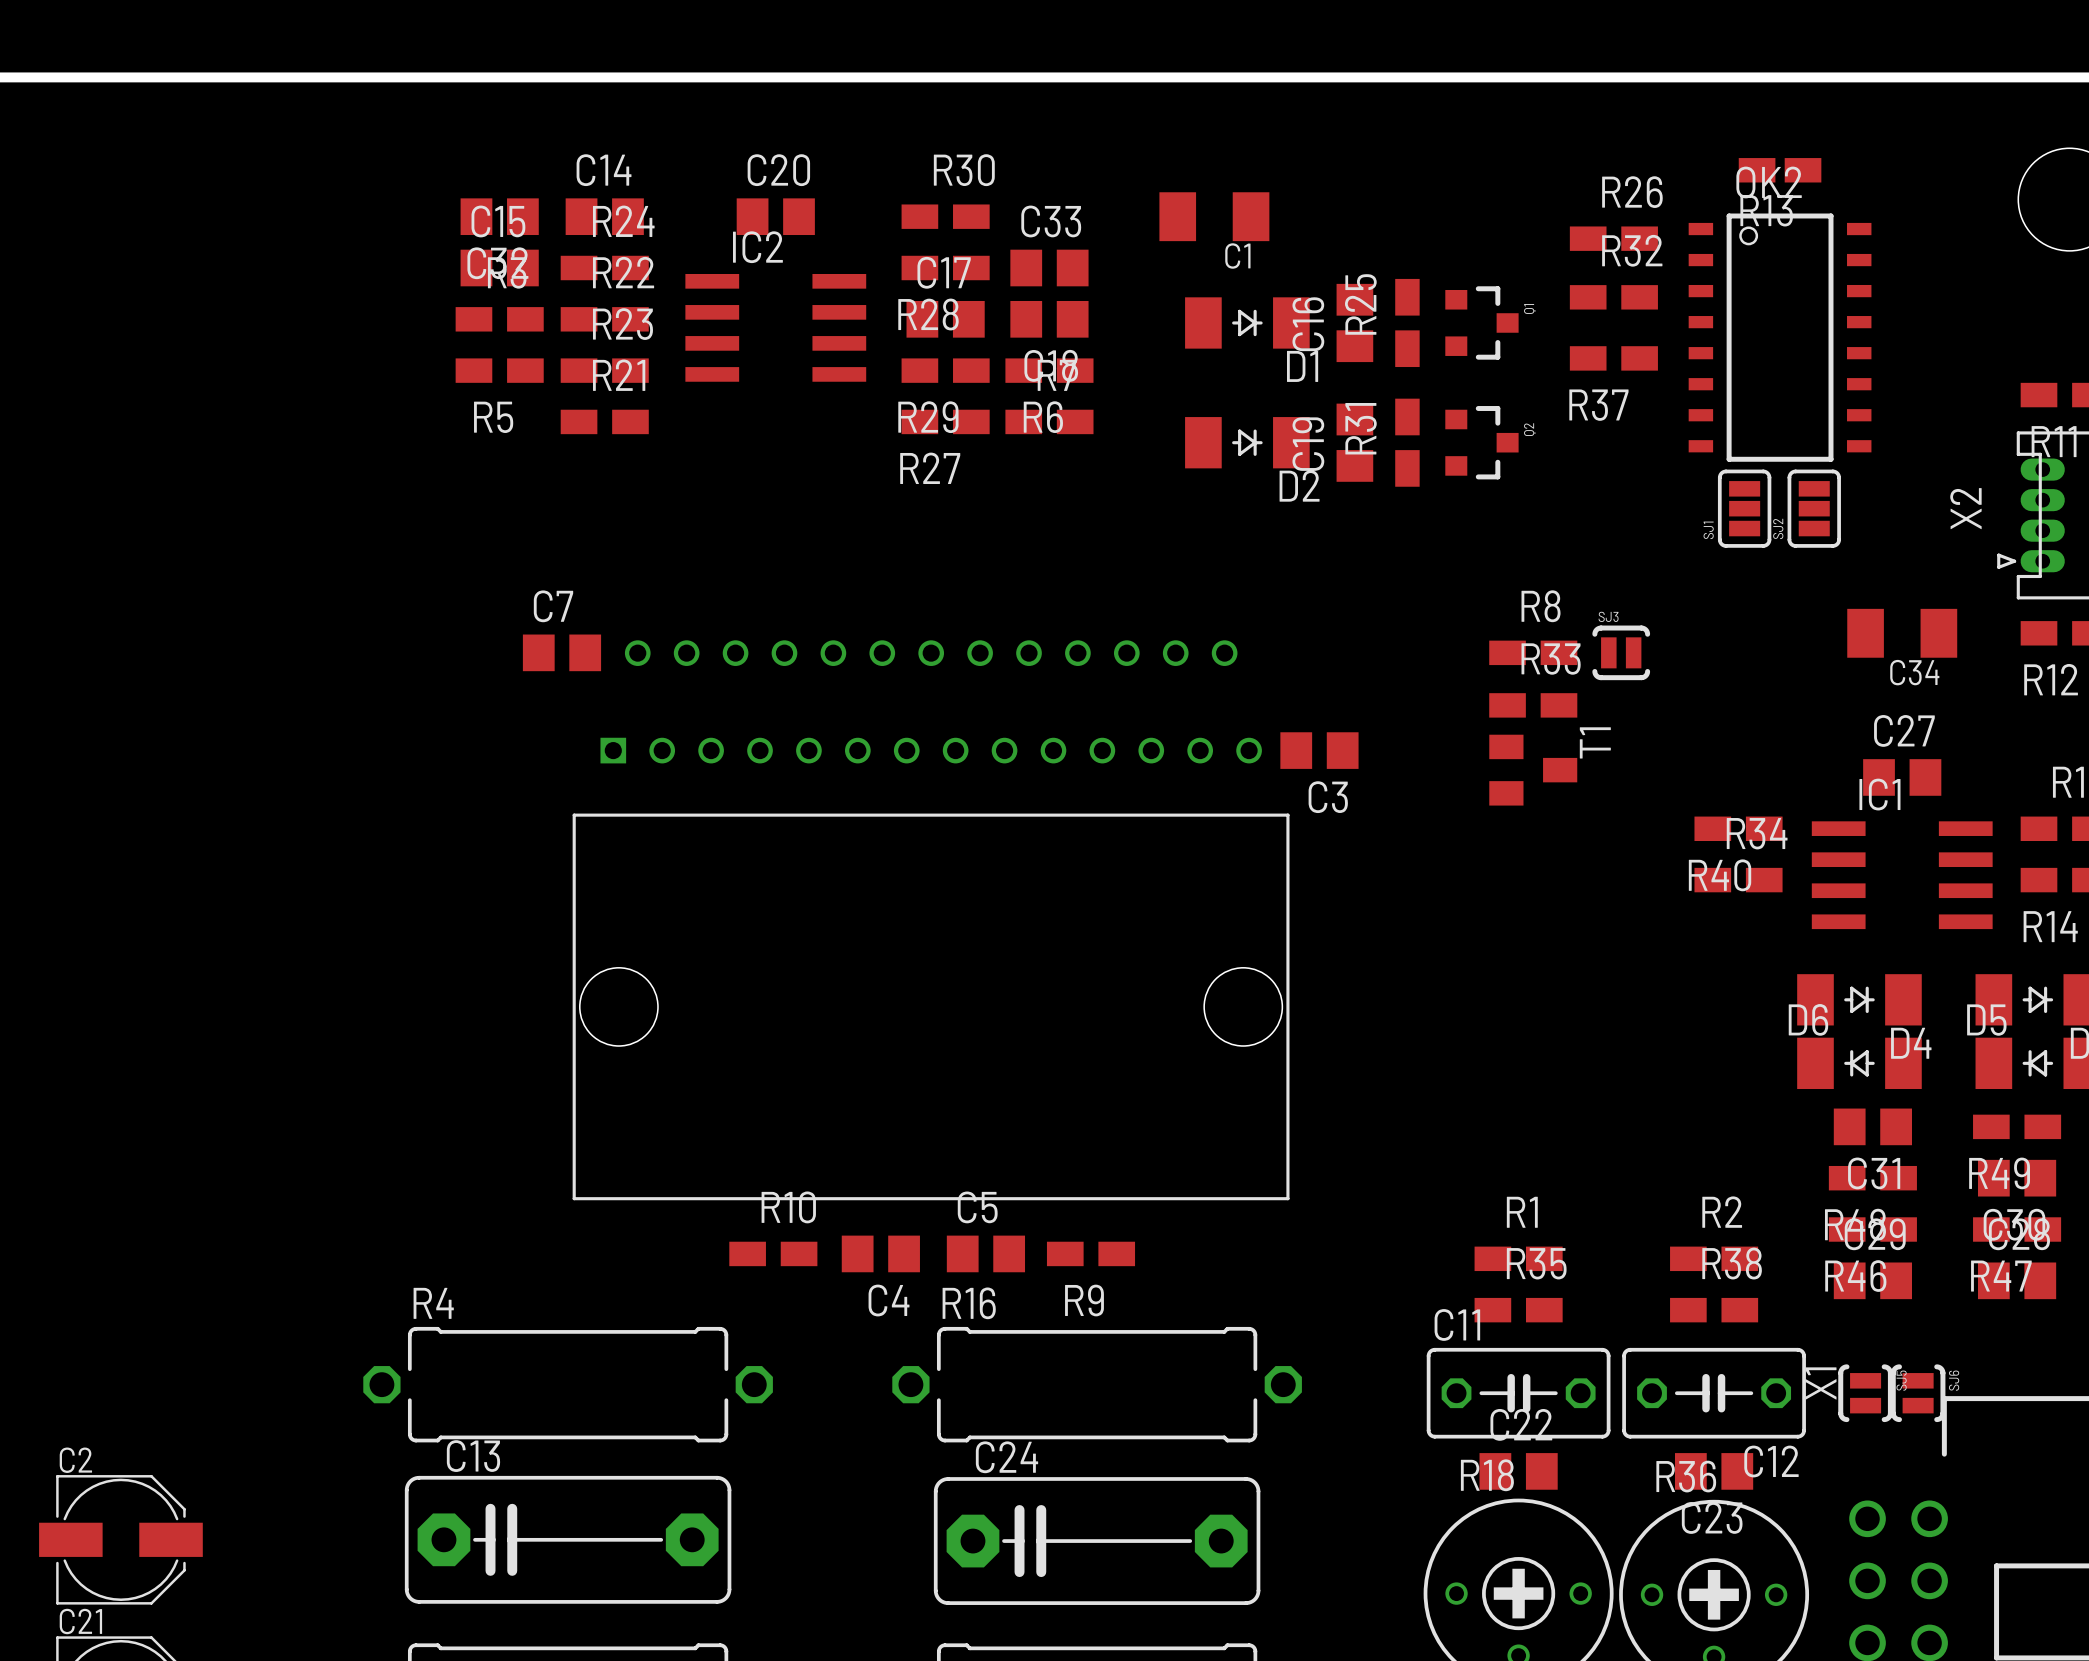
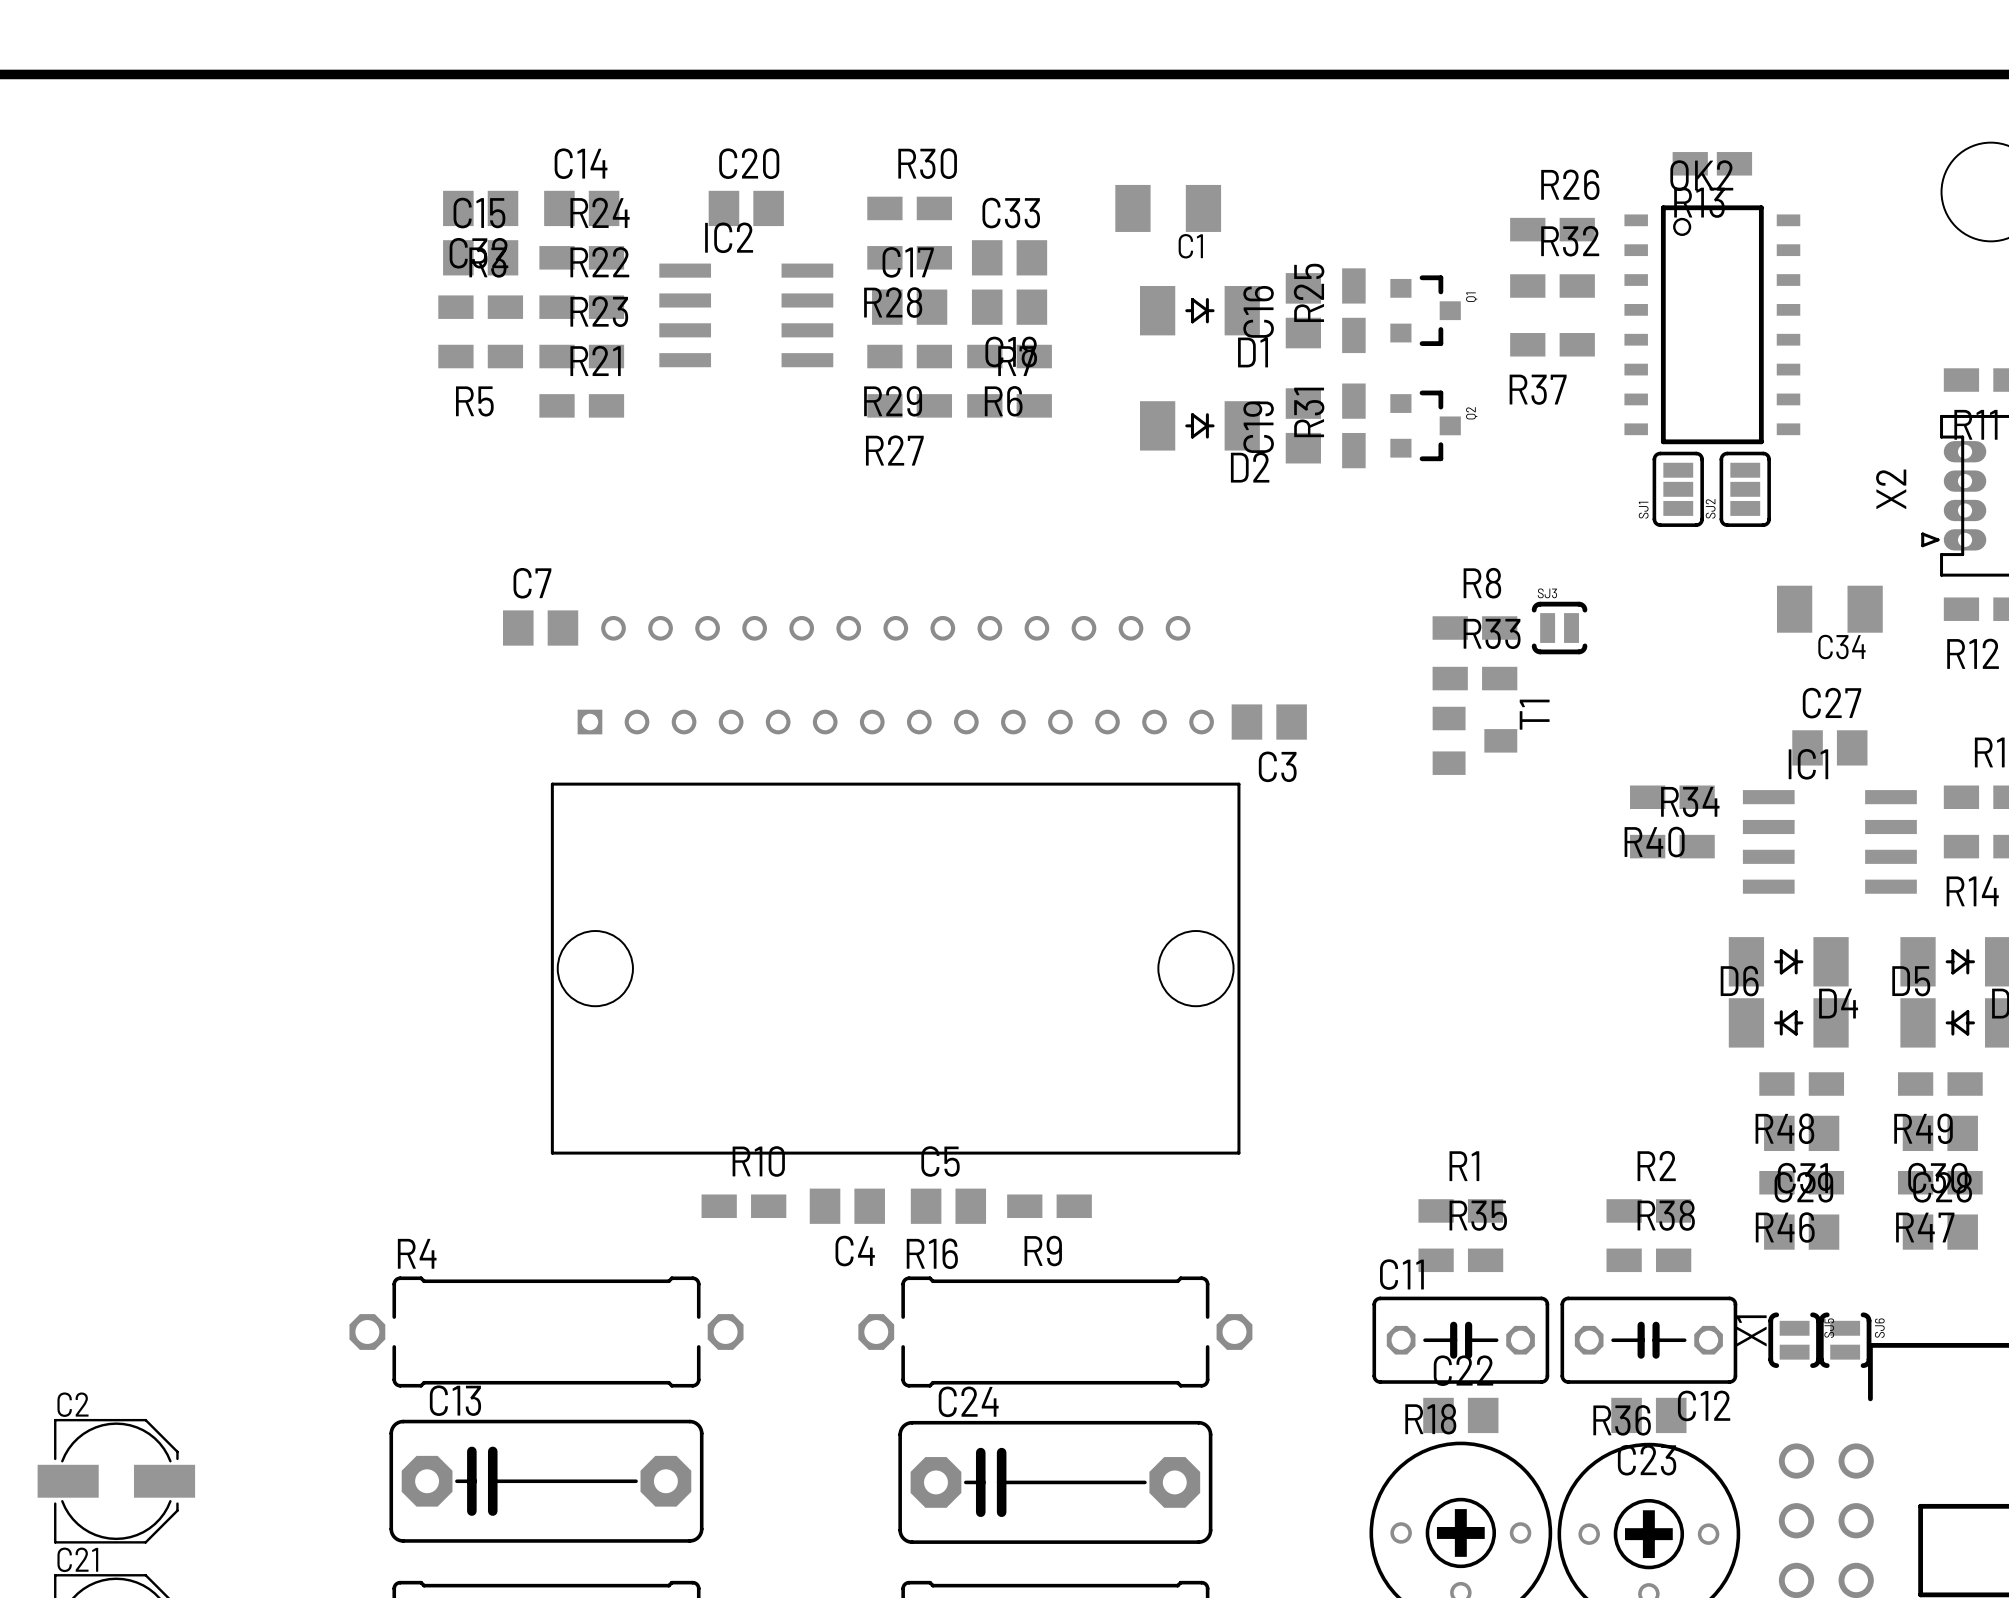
C31 position: (1872, 1126) -> (1801, 1133)
R48 position: (1872, 1178) -> (1801, 1084)

